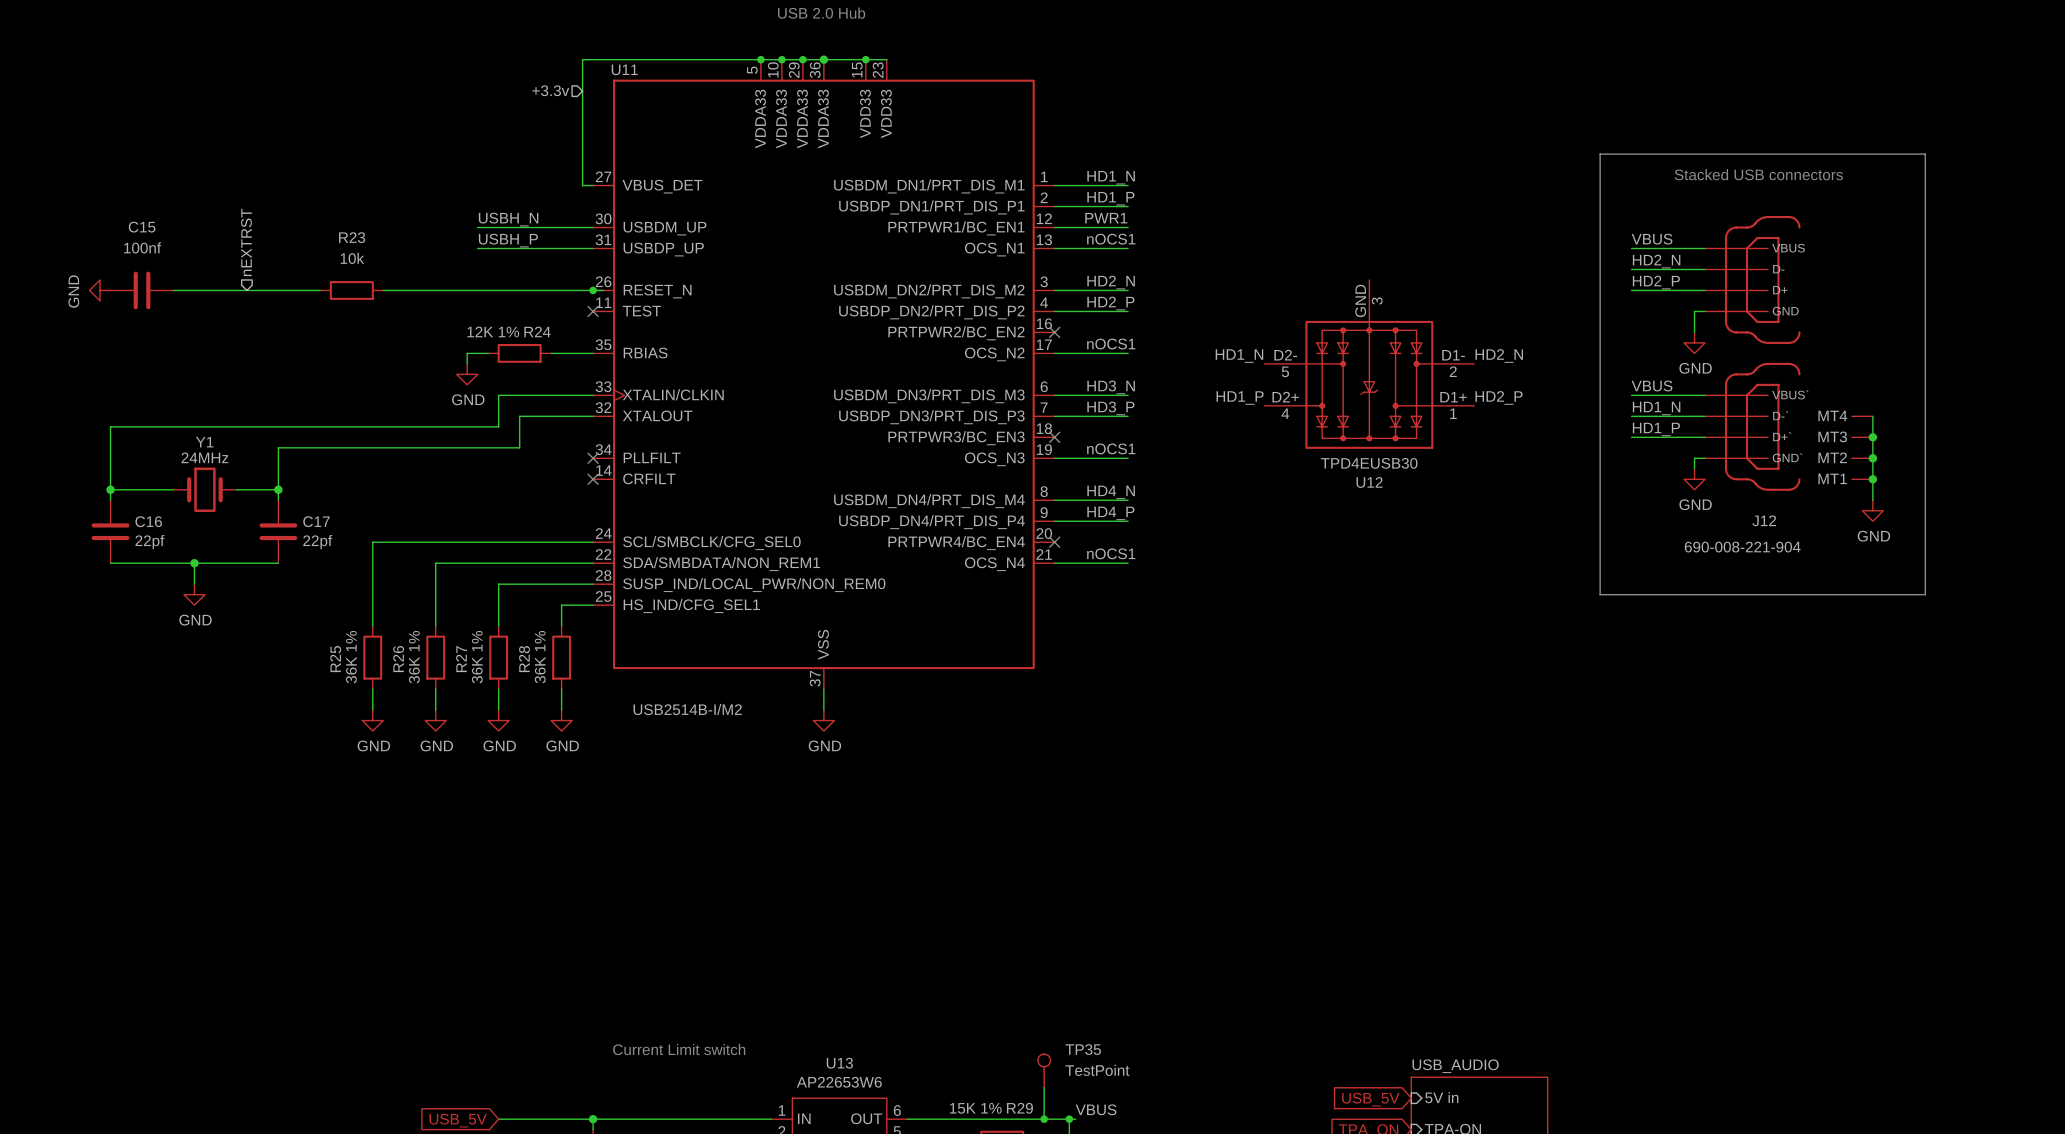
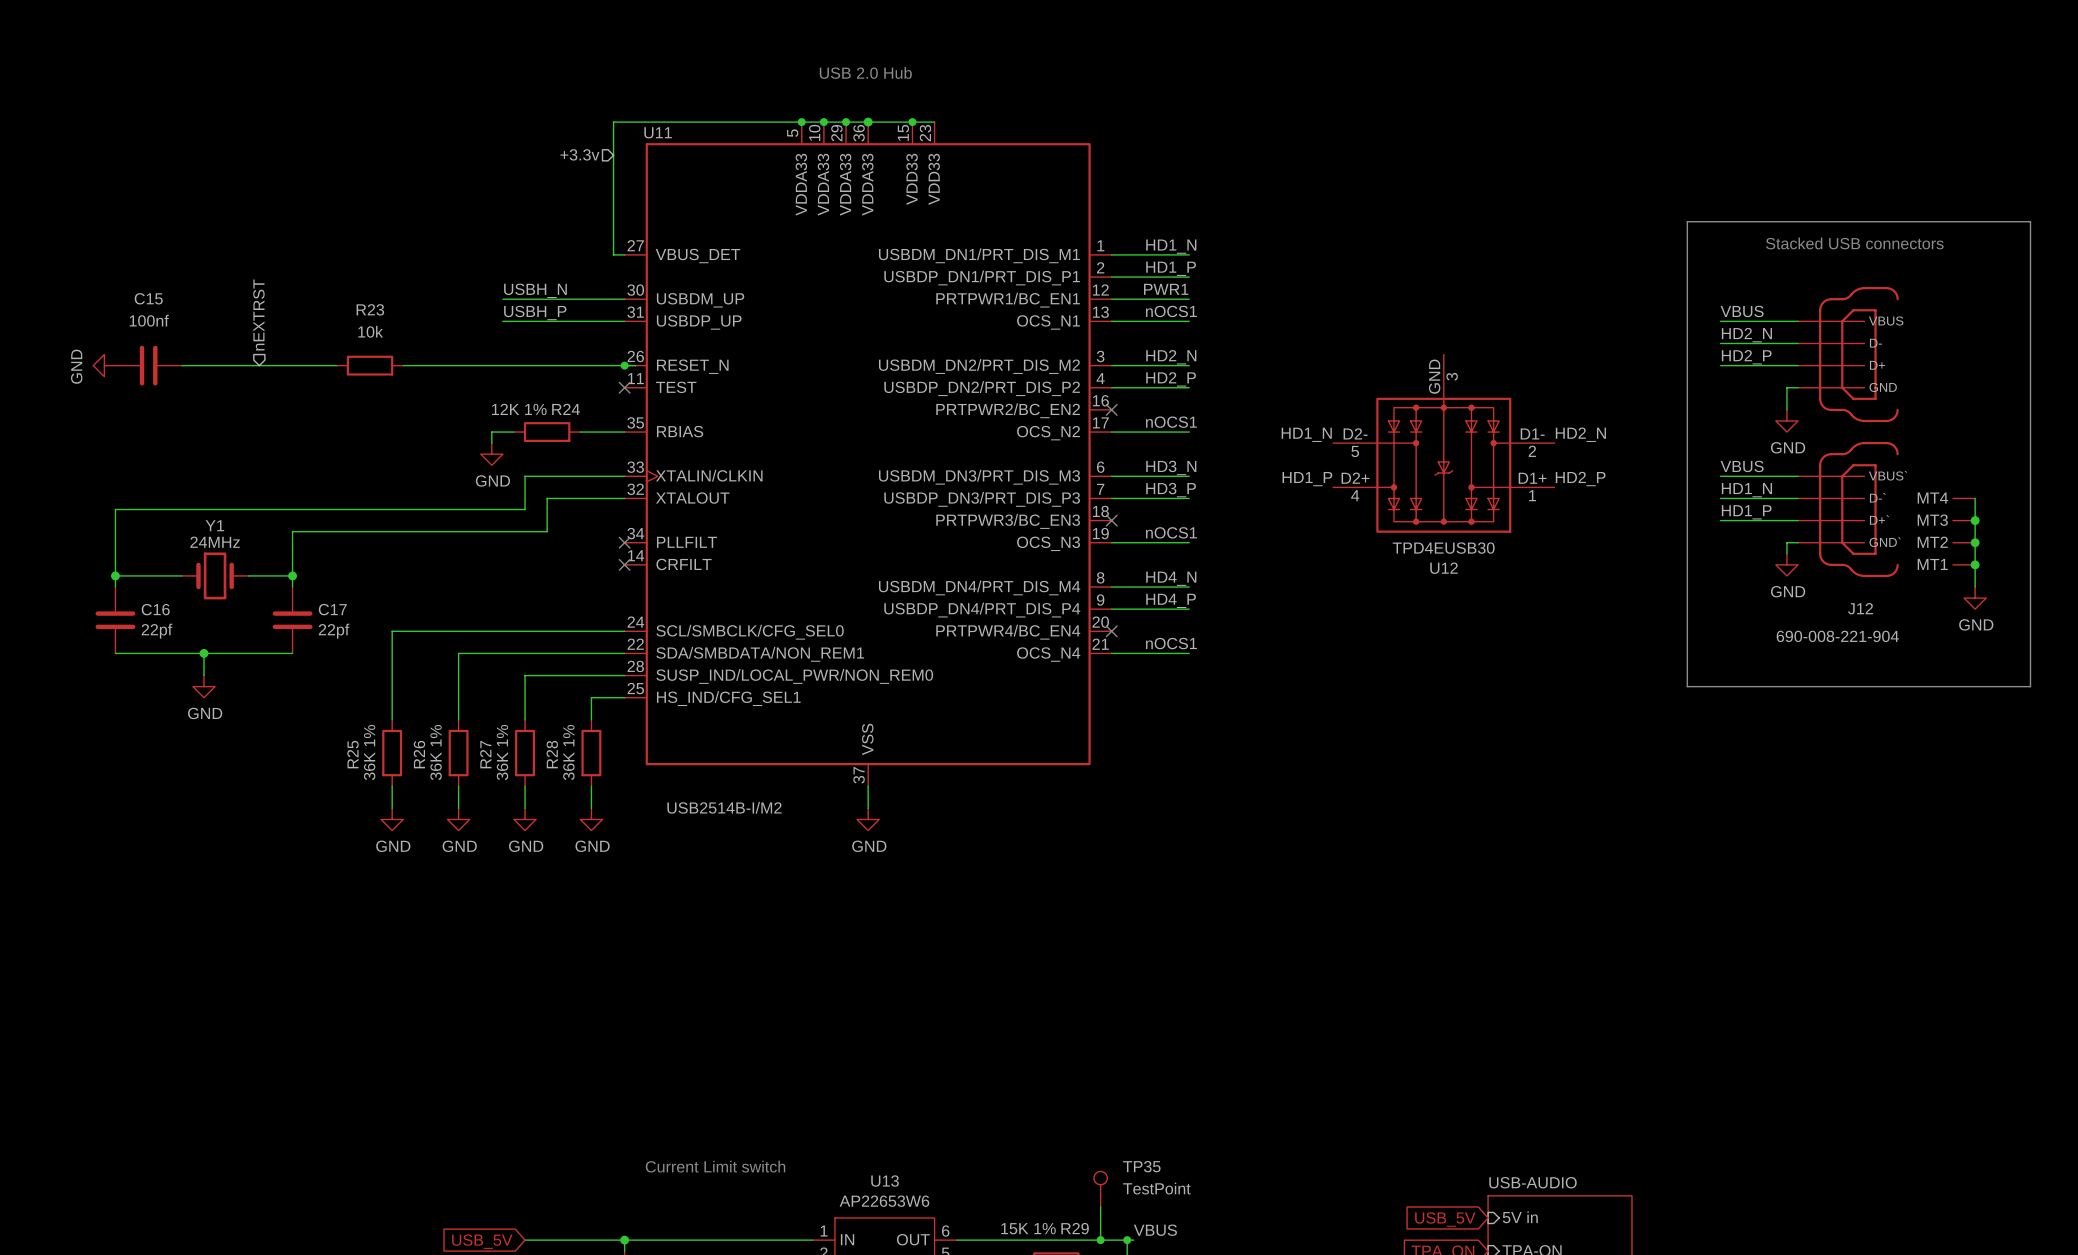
sheet USB_AUDIO name: USB_AUDIO (1455, 1066) -> USB-AUDIO (1533, 1182)

